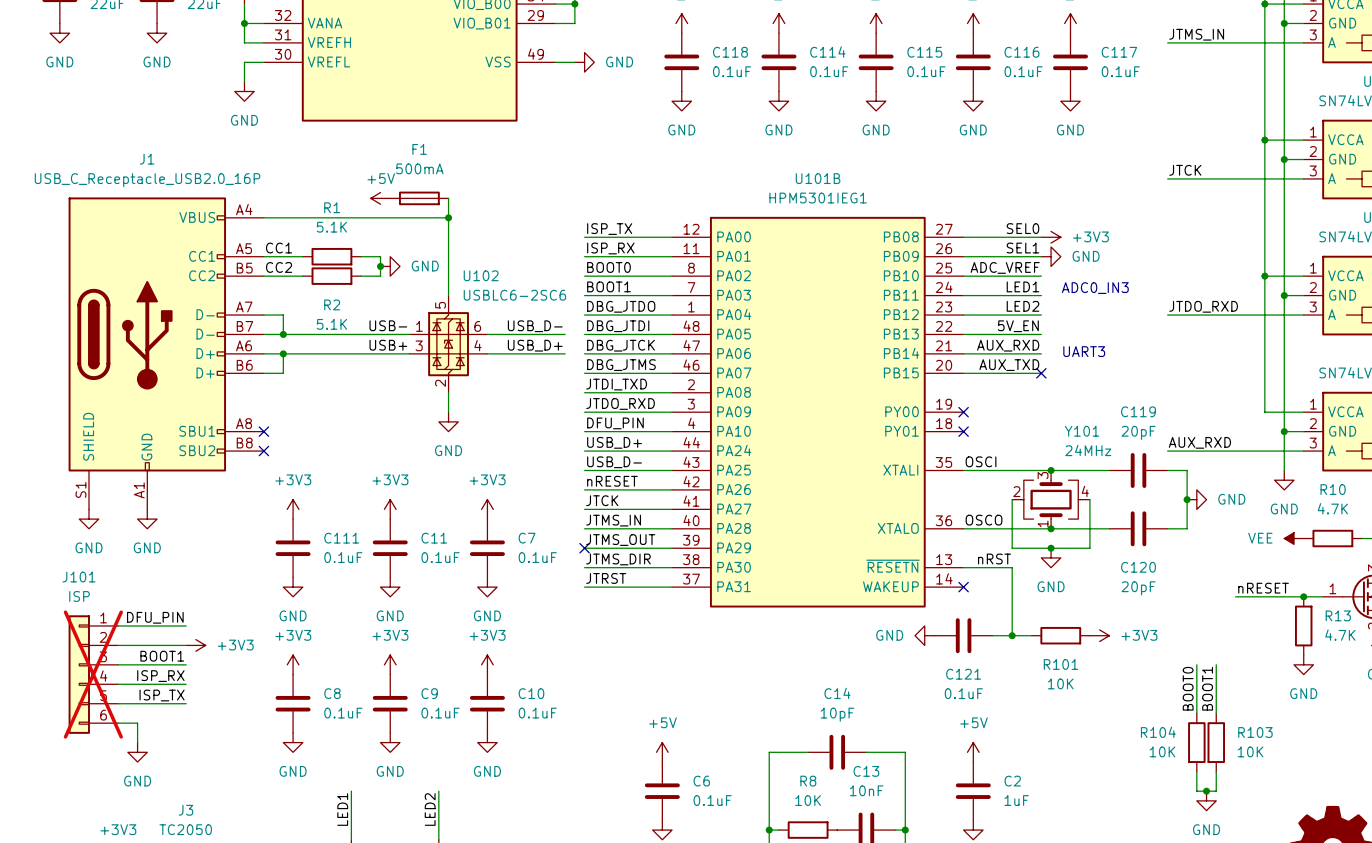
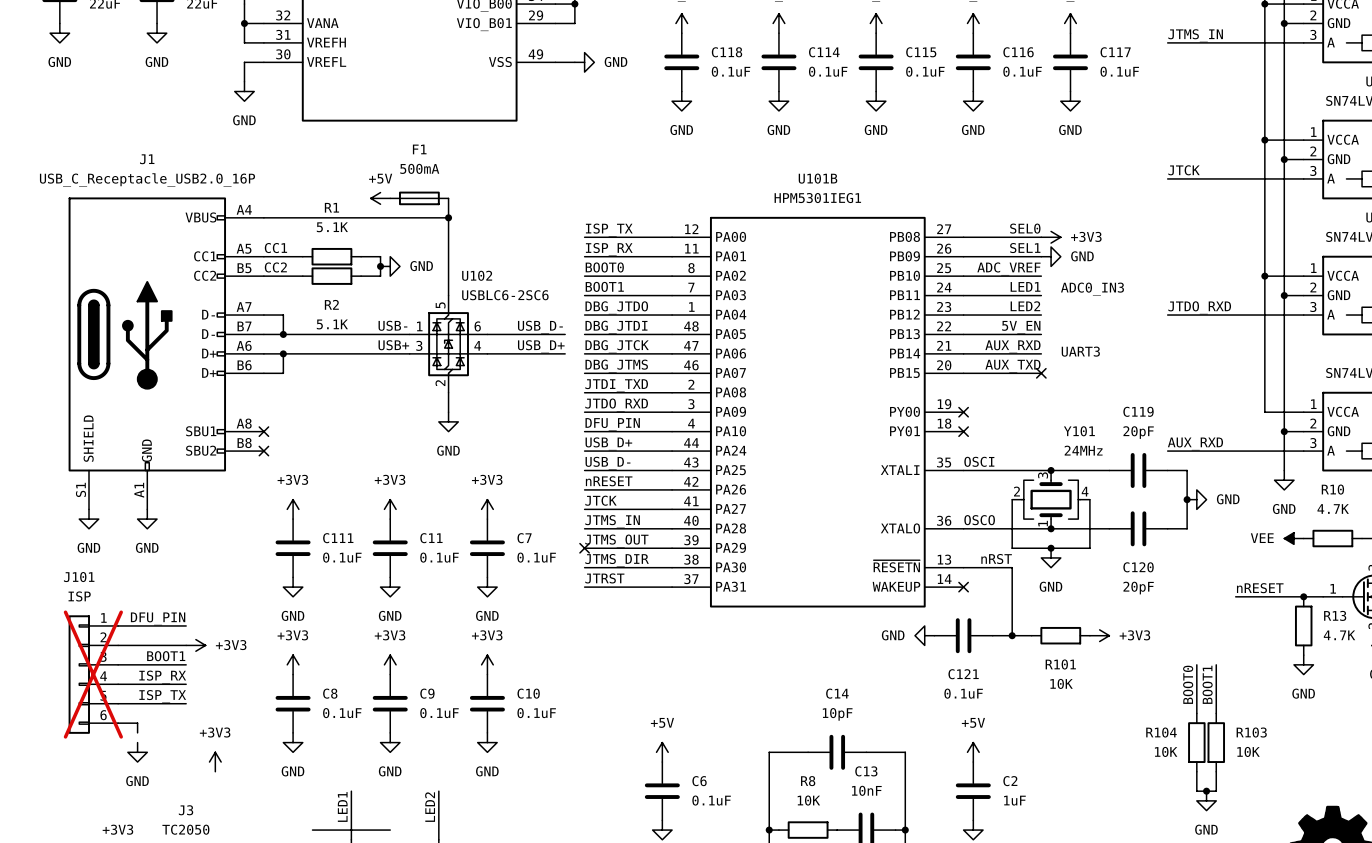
wire: (137, 732) (137, 742) -> none
power symbol: none -> +3V3 (215, 762)
wire: none -> (312, 830) (390, 830)

